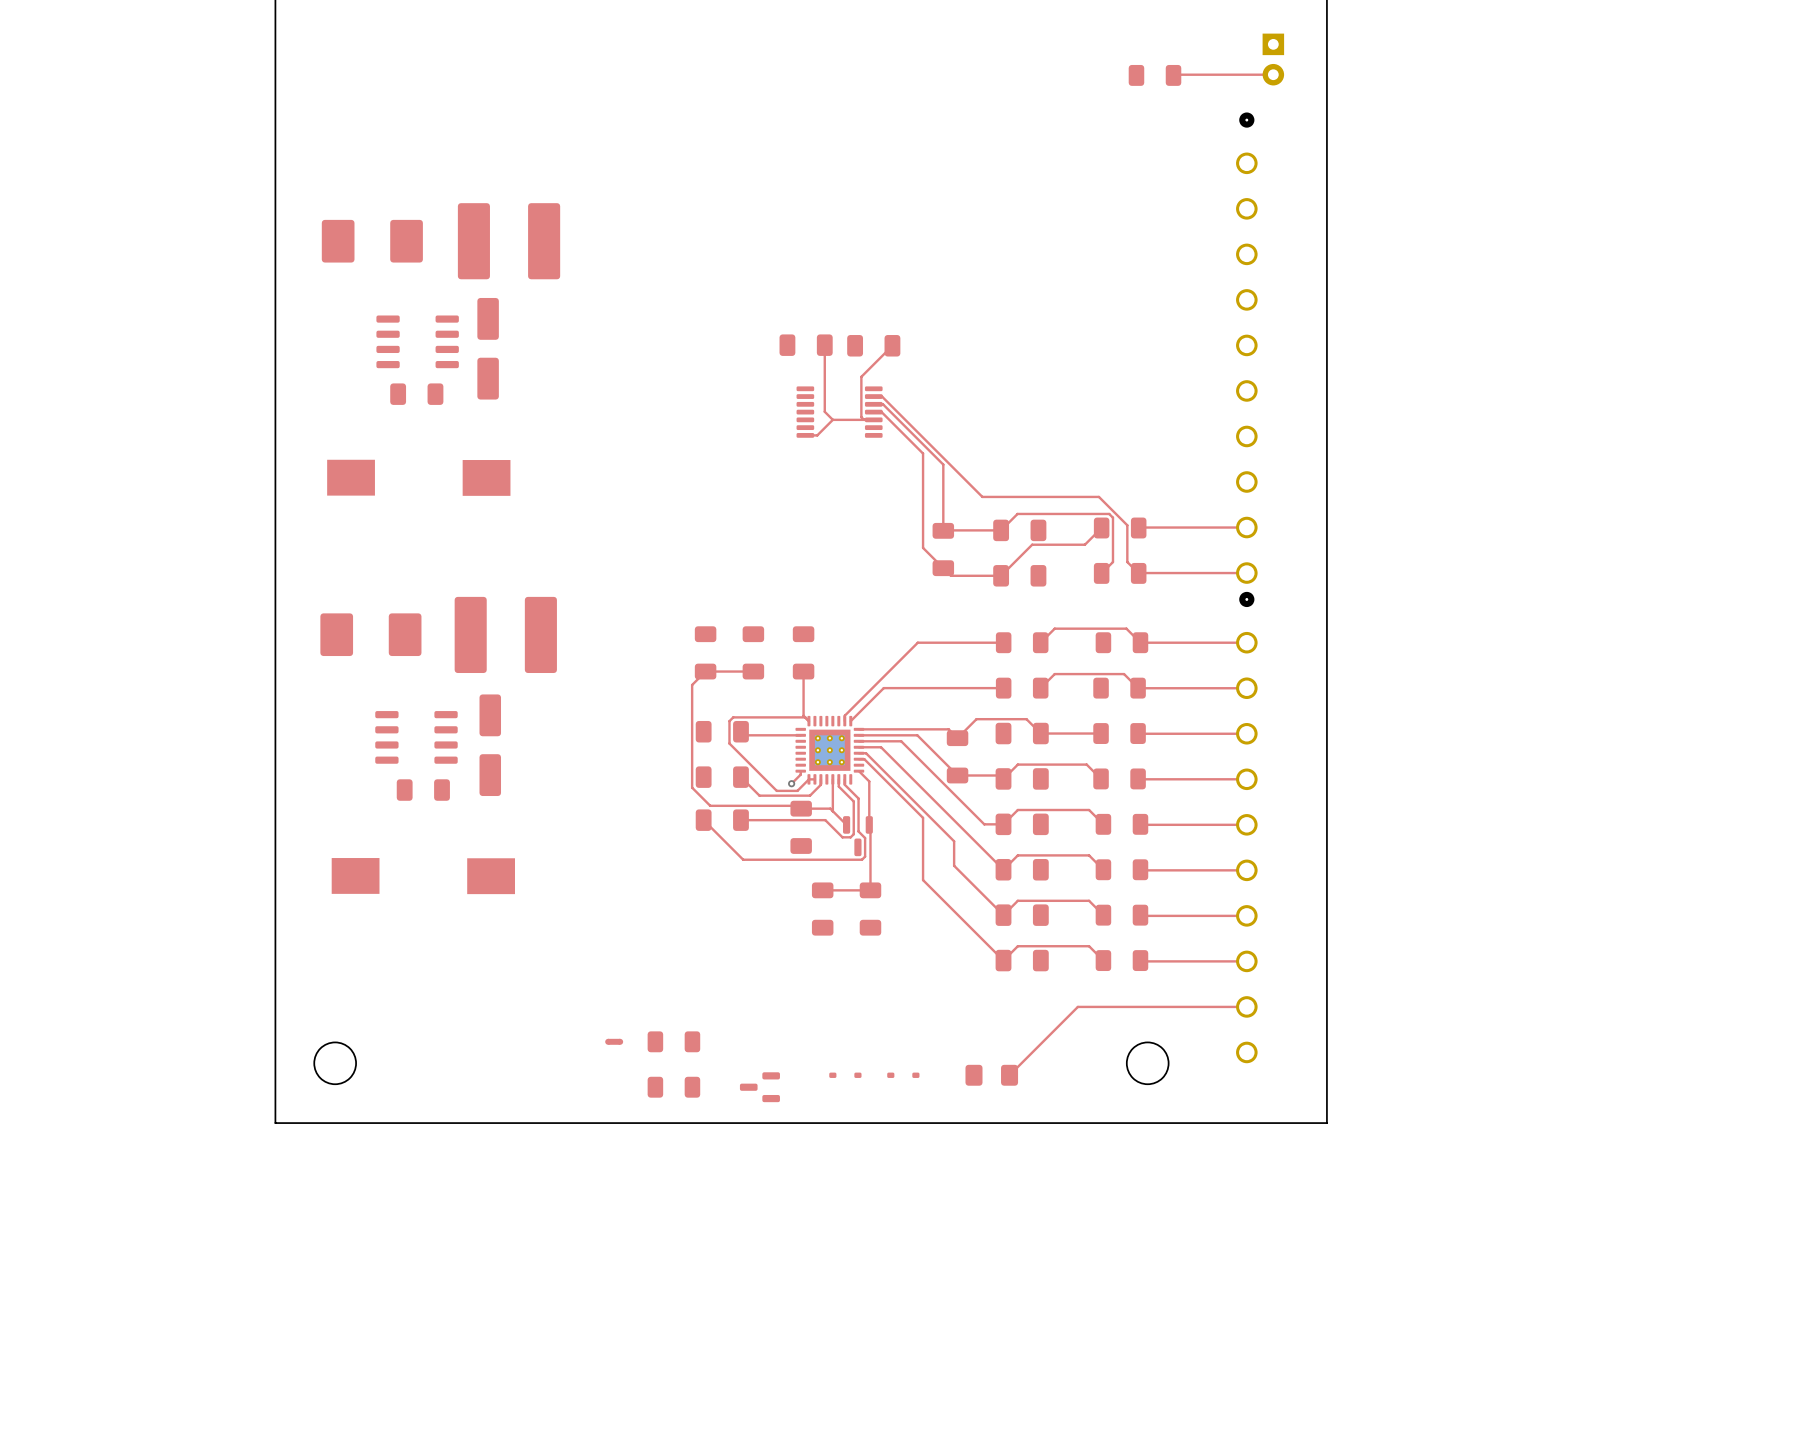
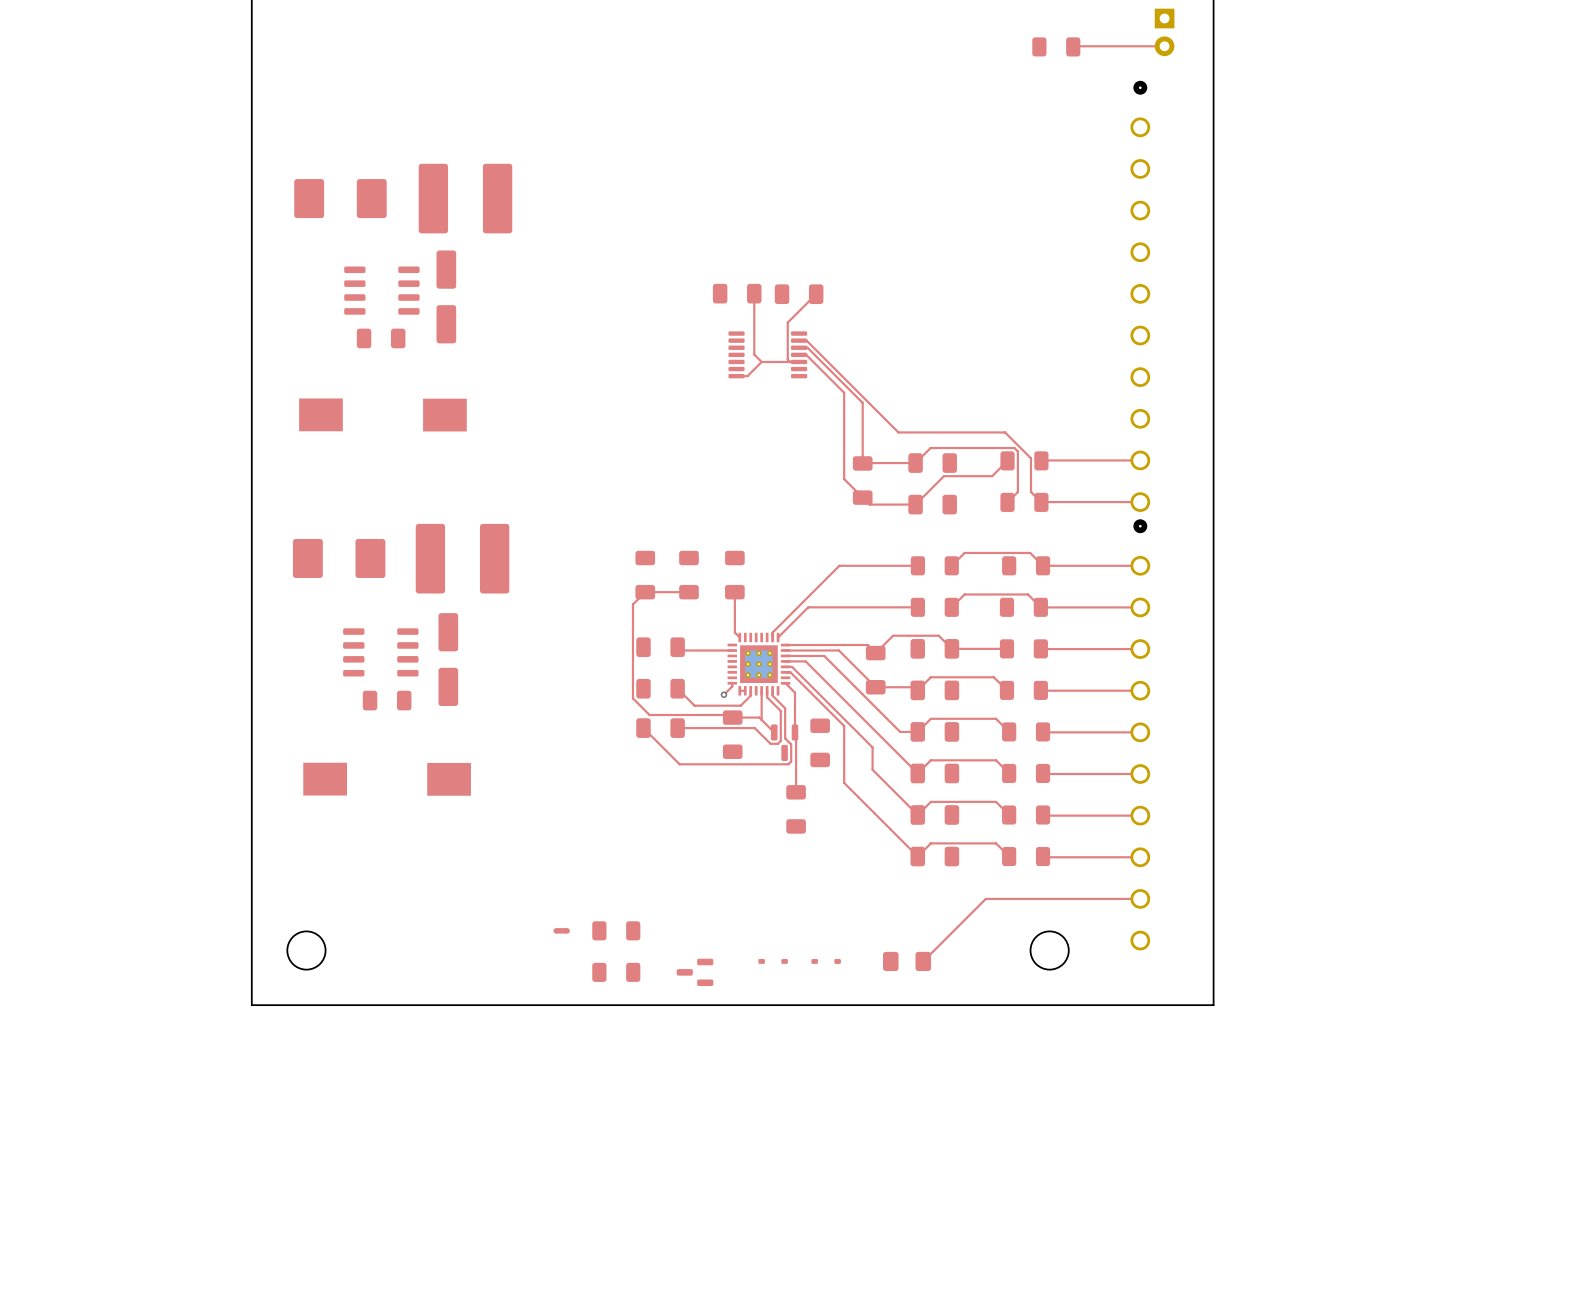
top track: (805, 717) (733, 717) (729, 721) (729, 743) (776, 790) (797, 790) (808, 779) -> none
top track: (868, 890) (820, 890) -> none
part position: (822, 909) -> (820, 742)

